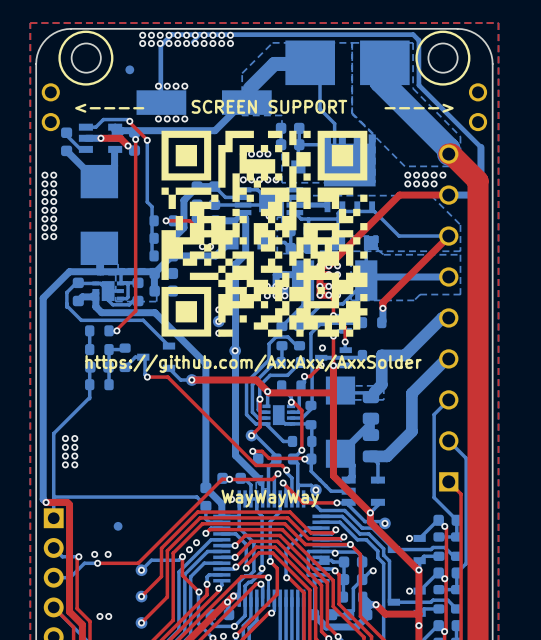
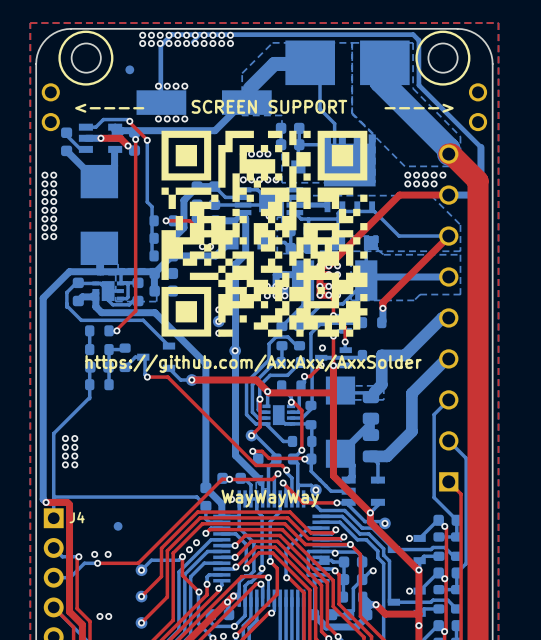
J4 name: none -> J4 (77, 517)

